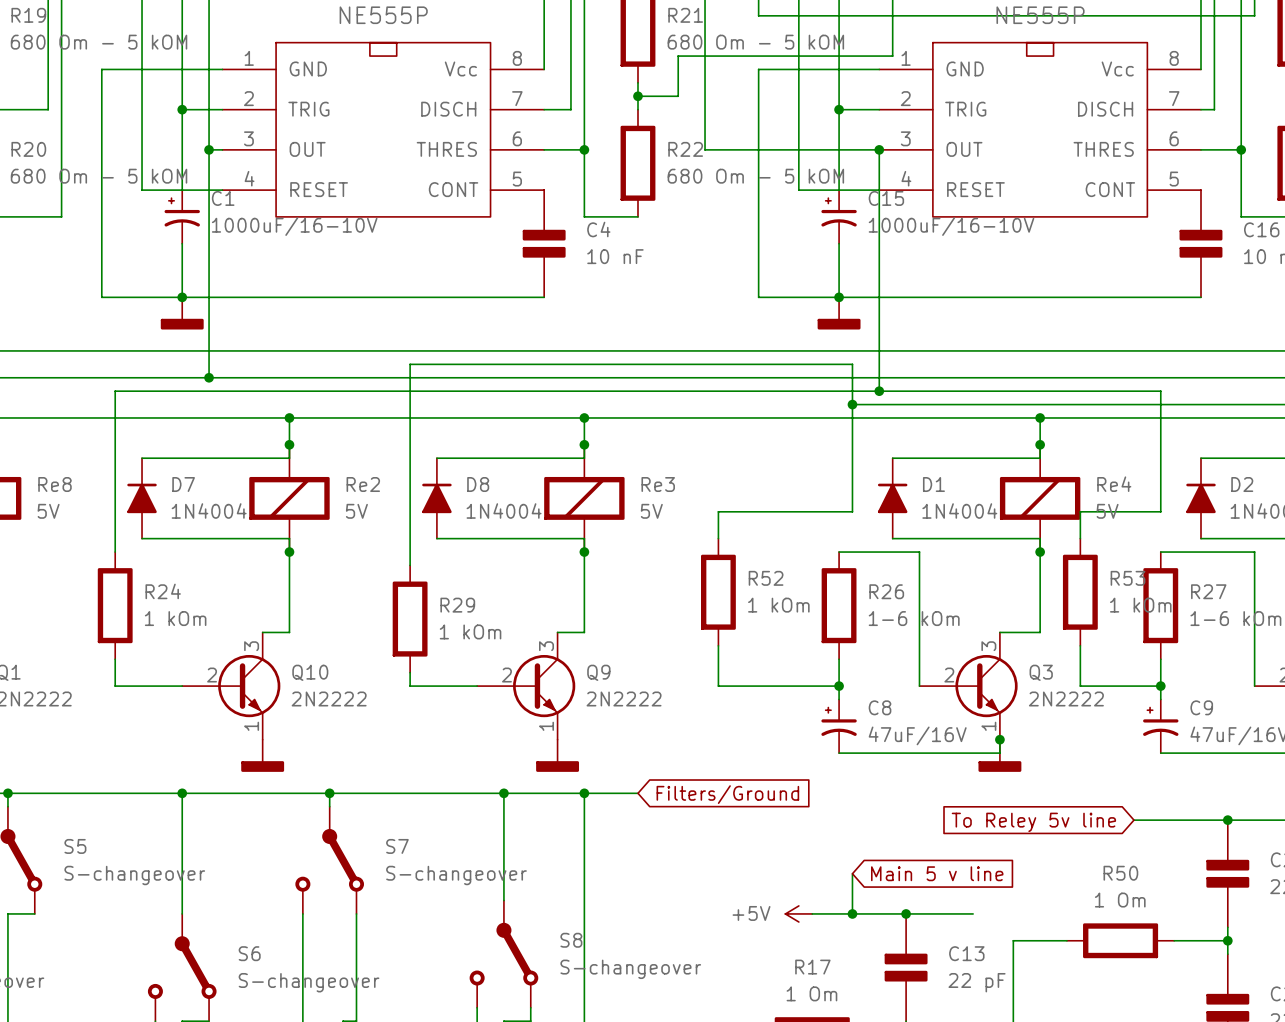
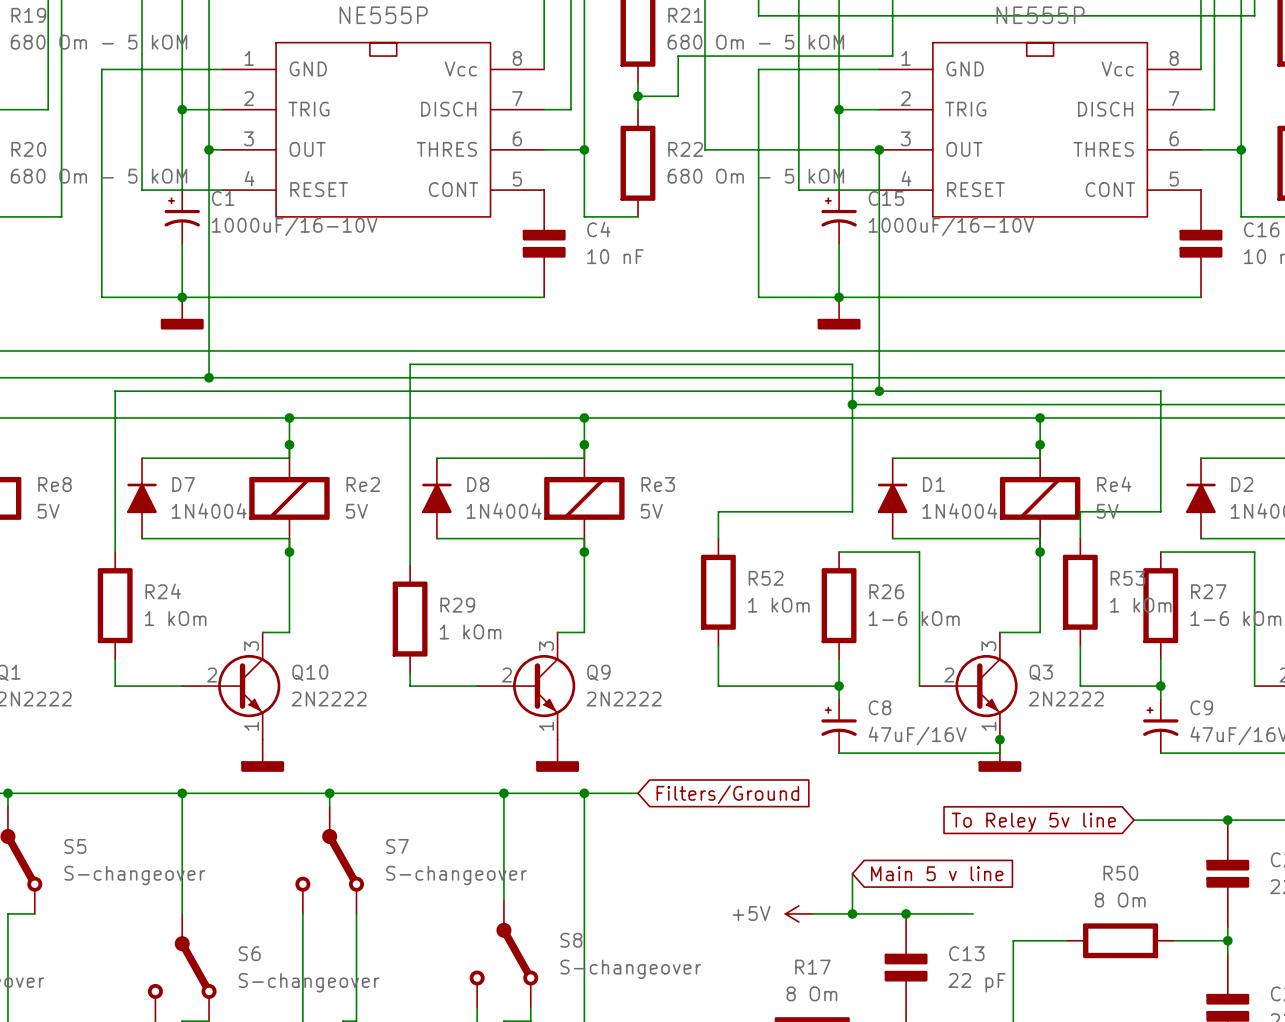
R50 value: 1 Om (1120, 900) -> 8 Om (1120, 900)
R17 value: 1 Om (811, 993) -> 8 Om (811, 993)

